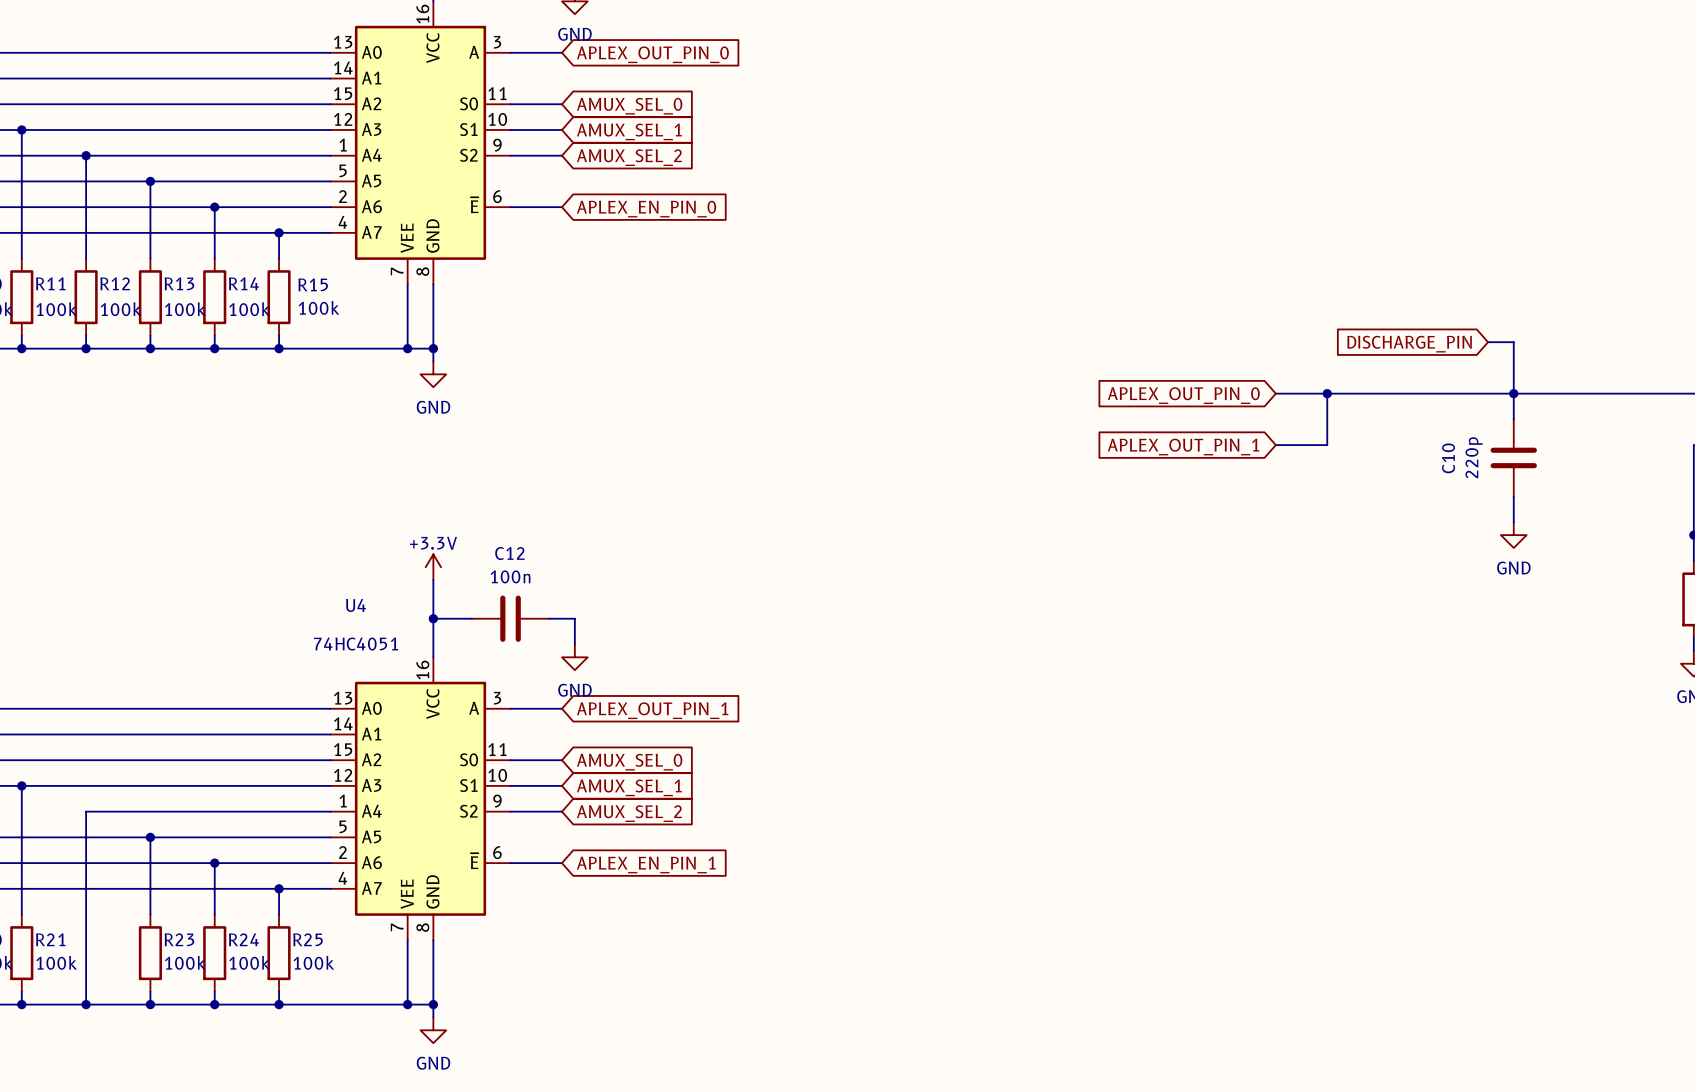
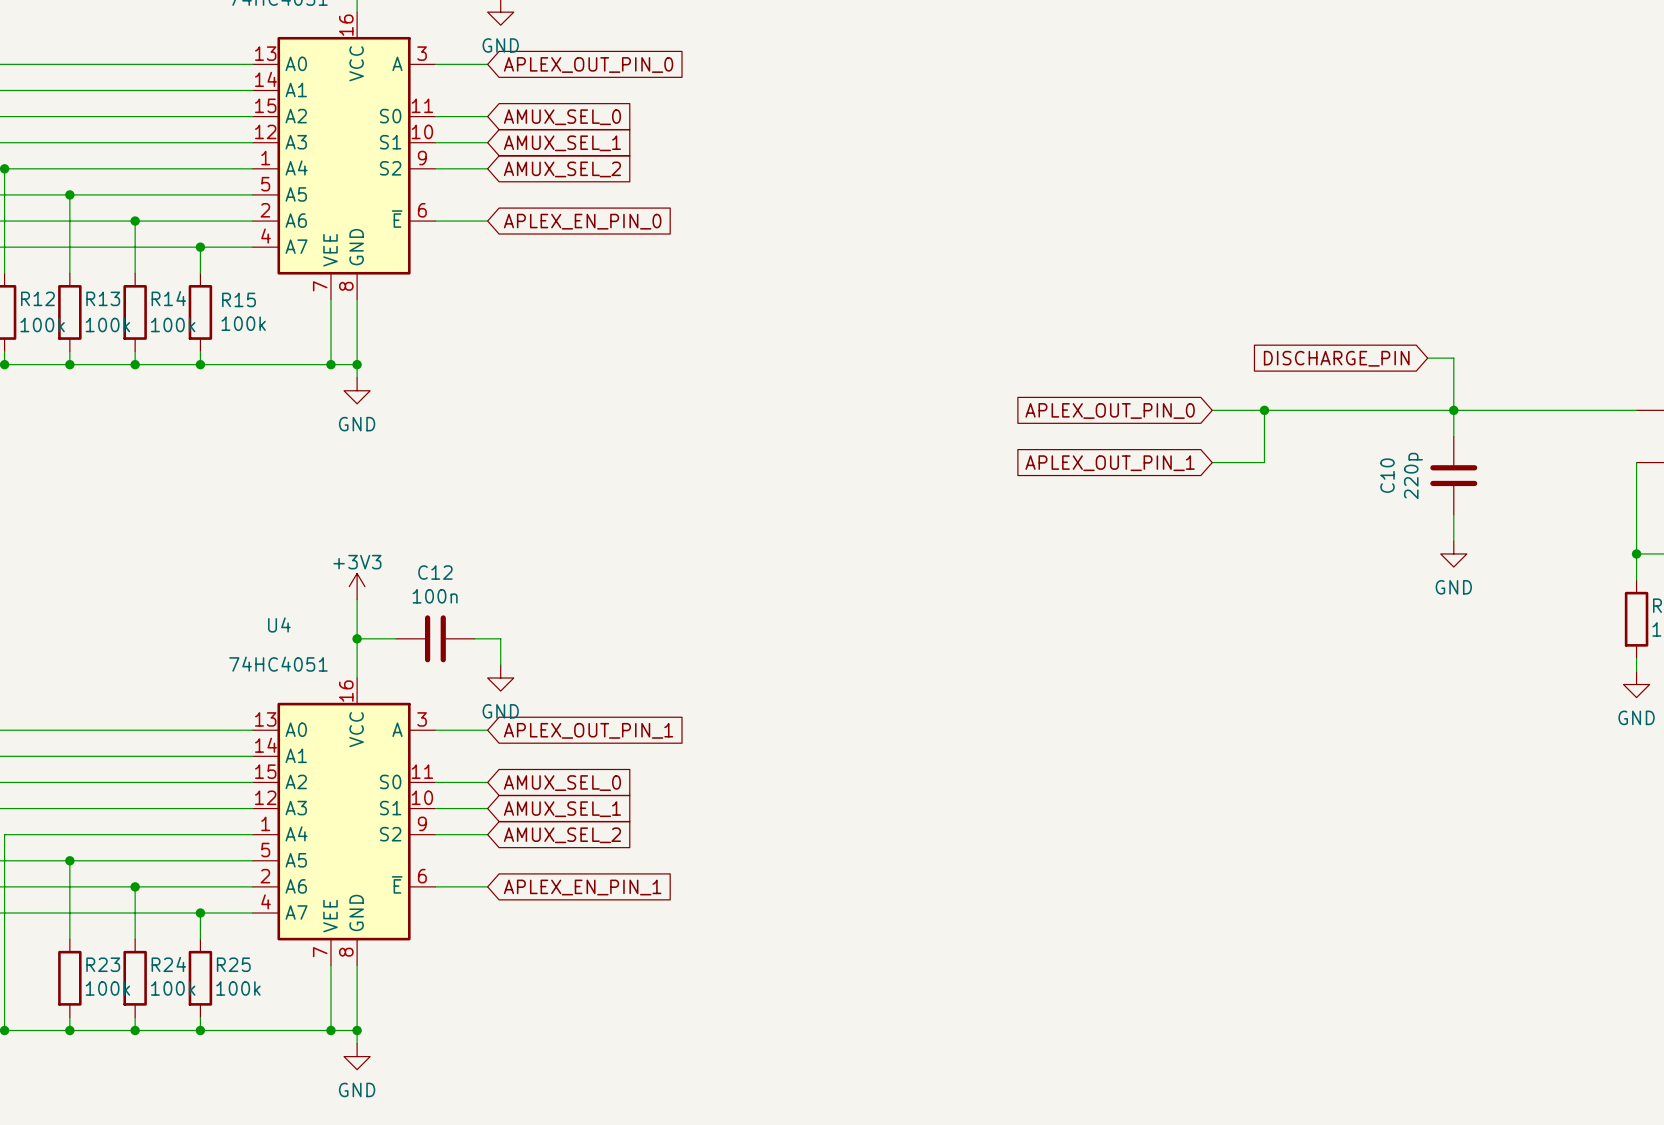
power symbol: +3.3V (433, 567) -> +3V3 (357, 586)

